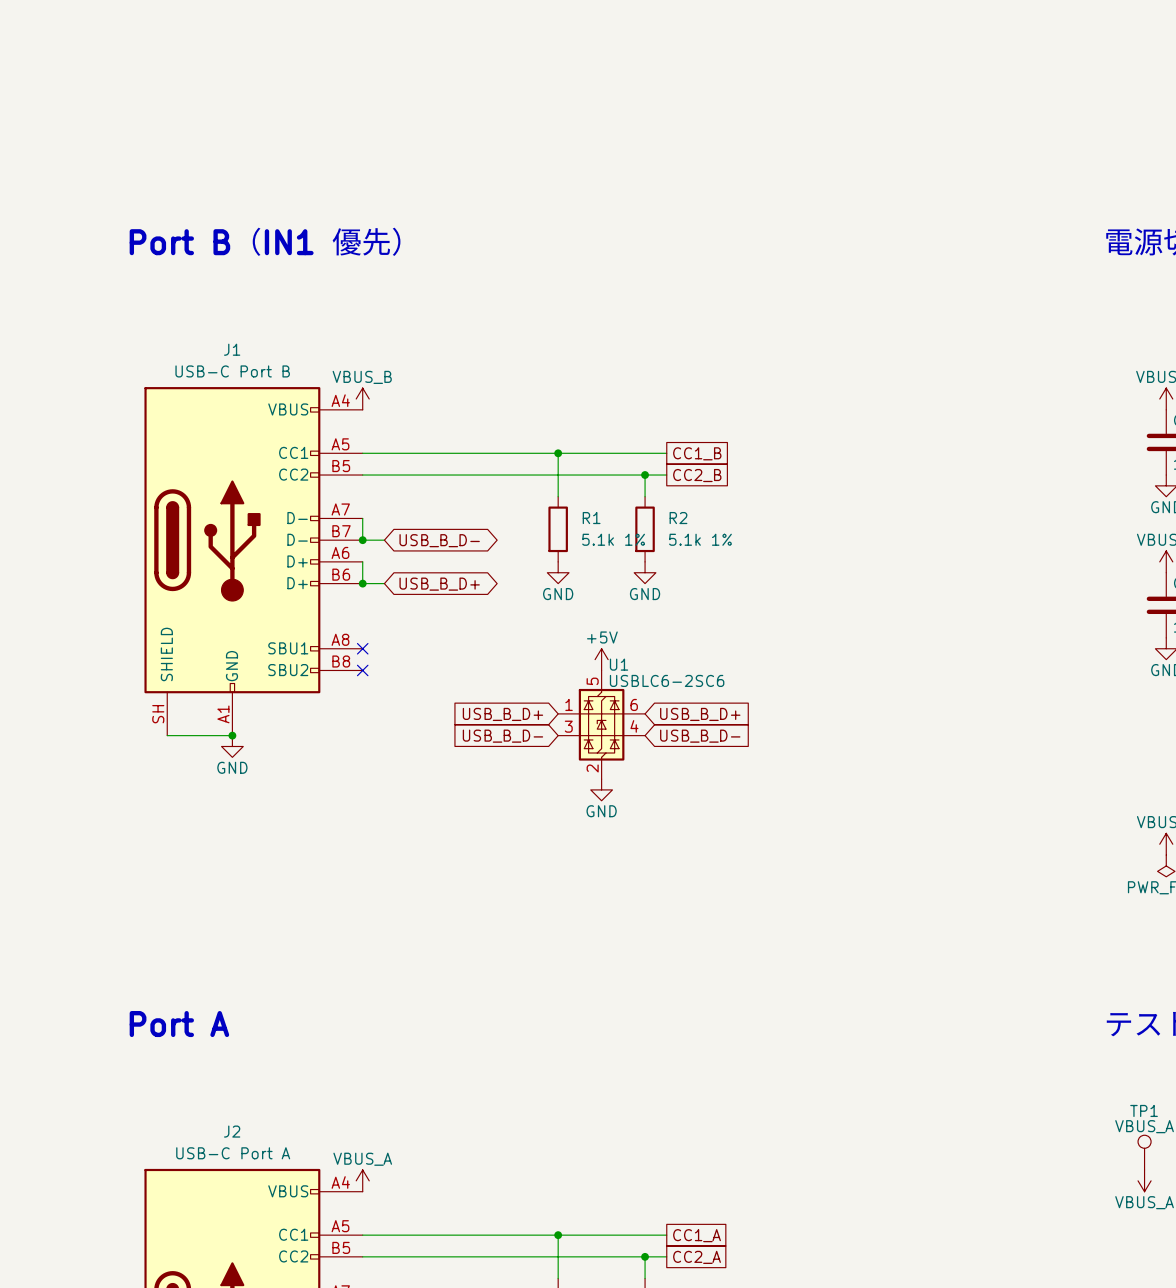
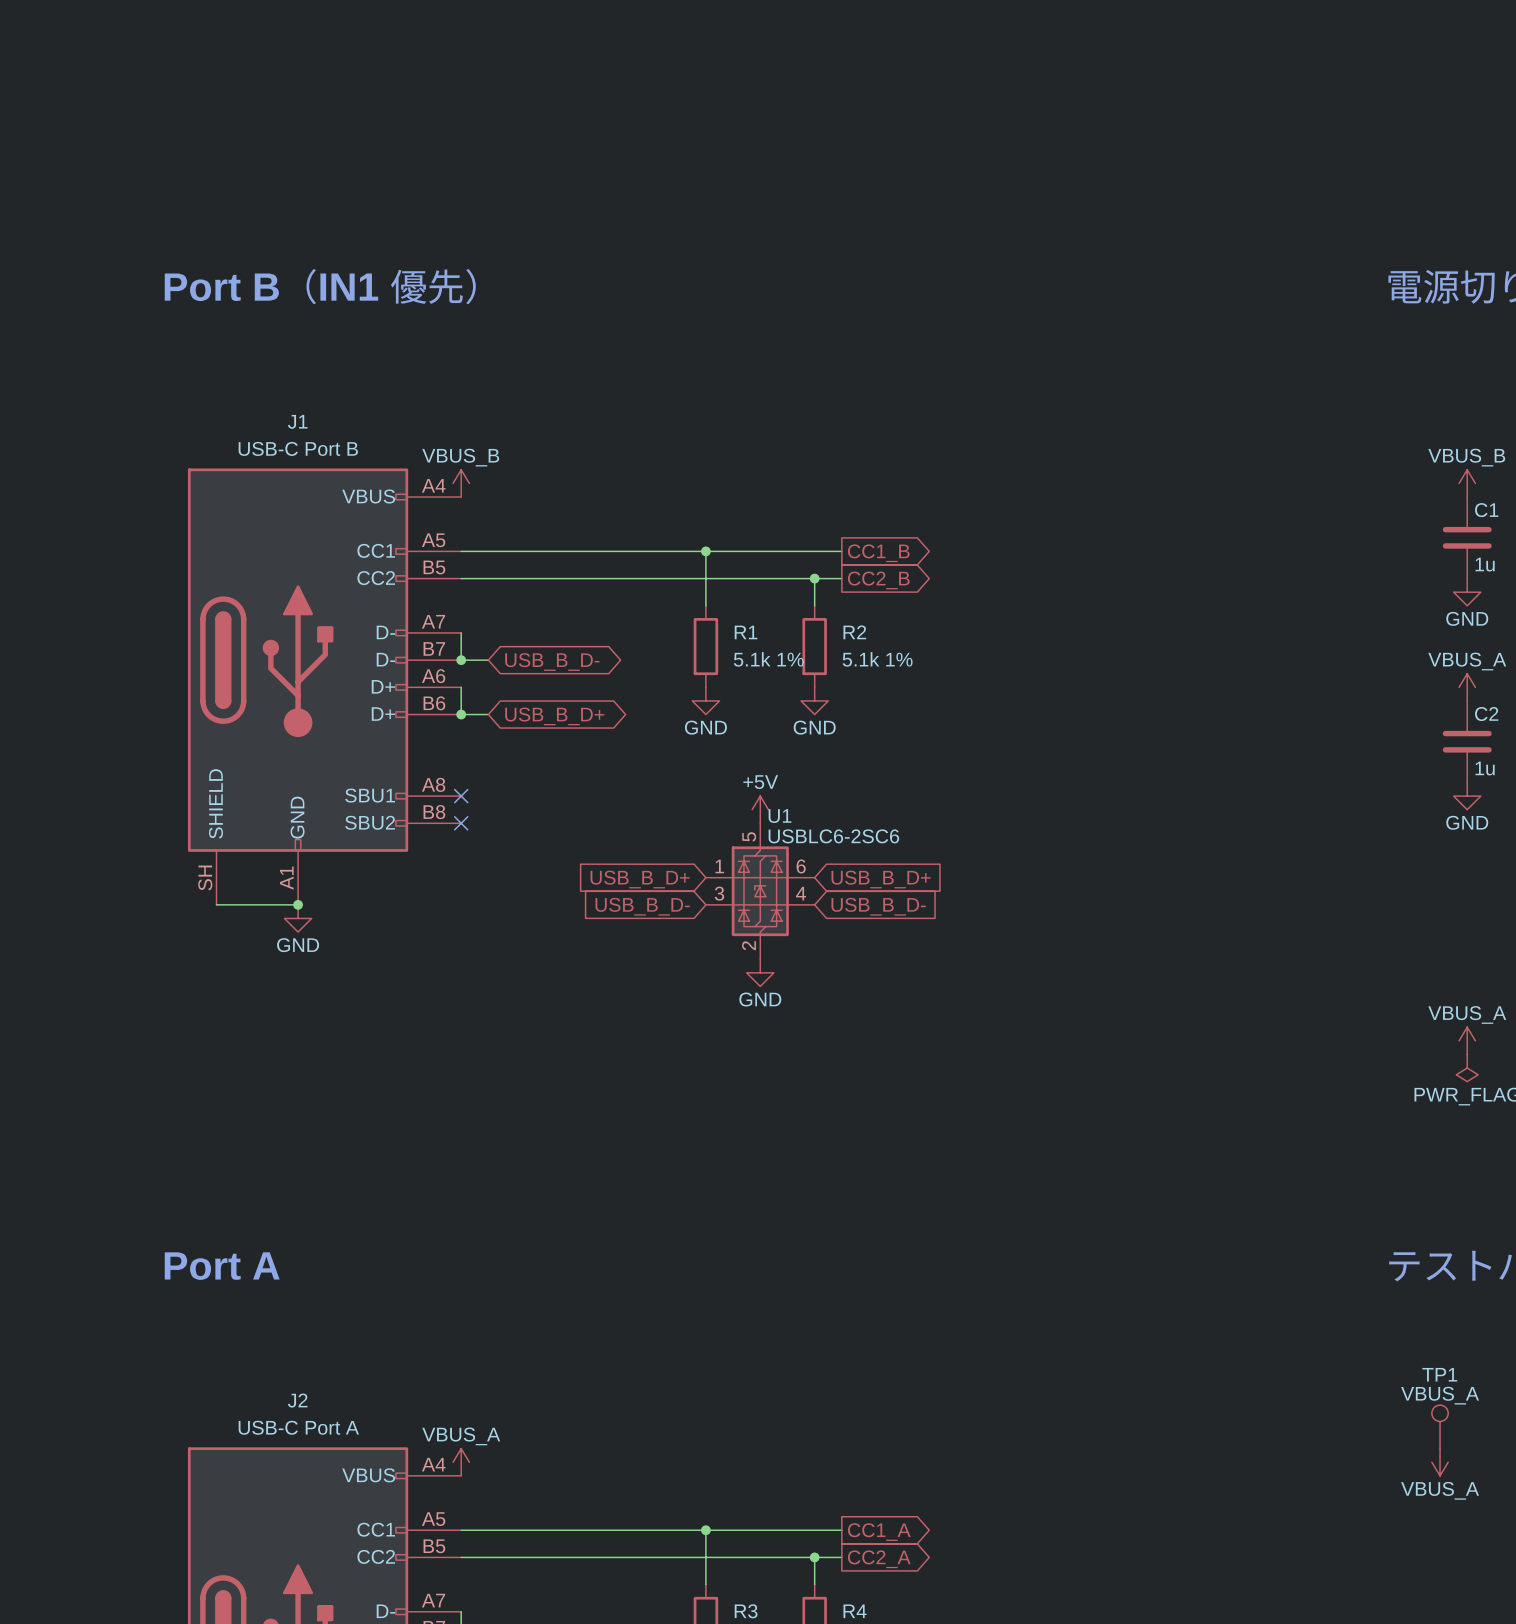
global label shape: passive (697, 453) -> output (878, 553)
global label shape: passive (697, 475) -> output (878, 580)
global label shape: passive (697, 1235) -> output (879, 1532)
global label shape: passive (697, 1257) -> output (879, 1559)

